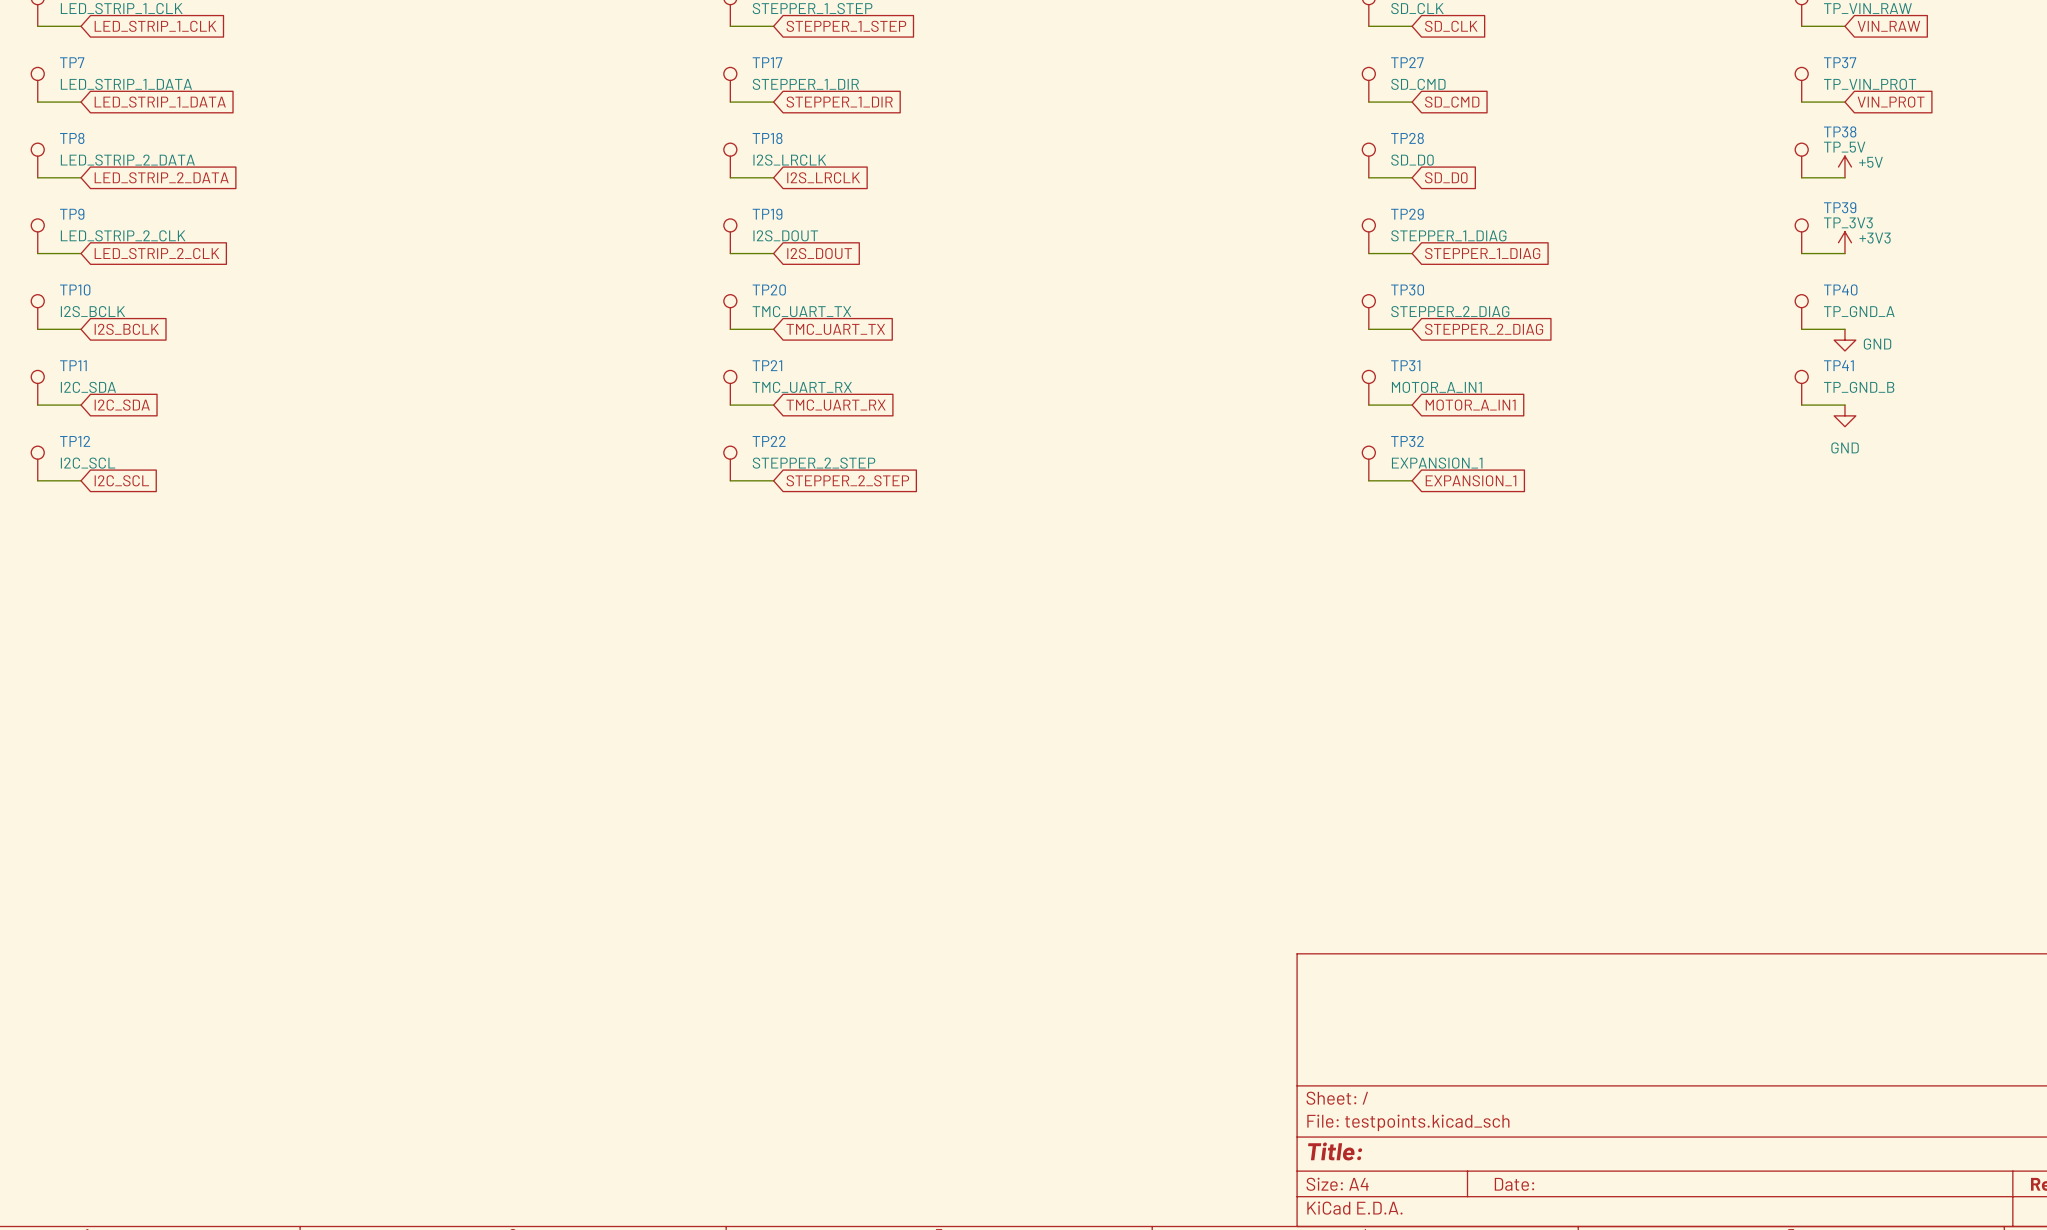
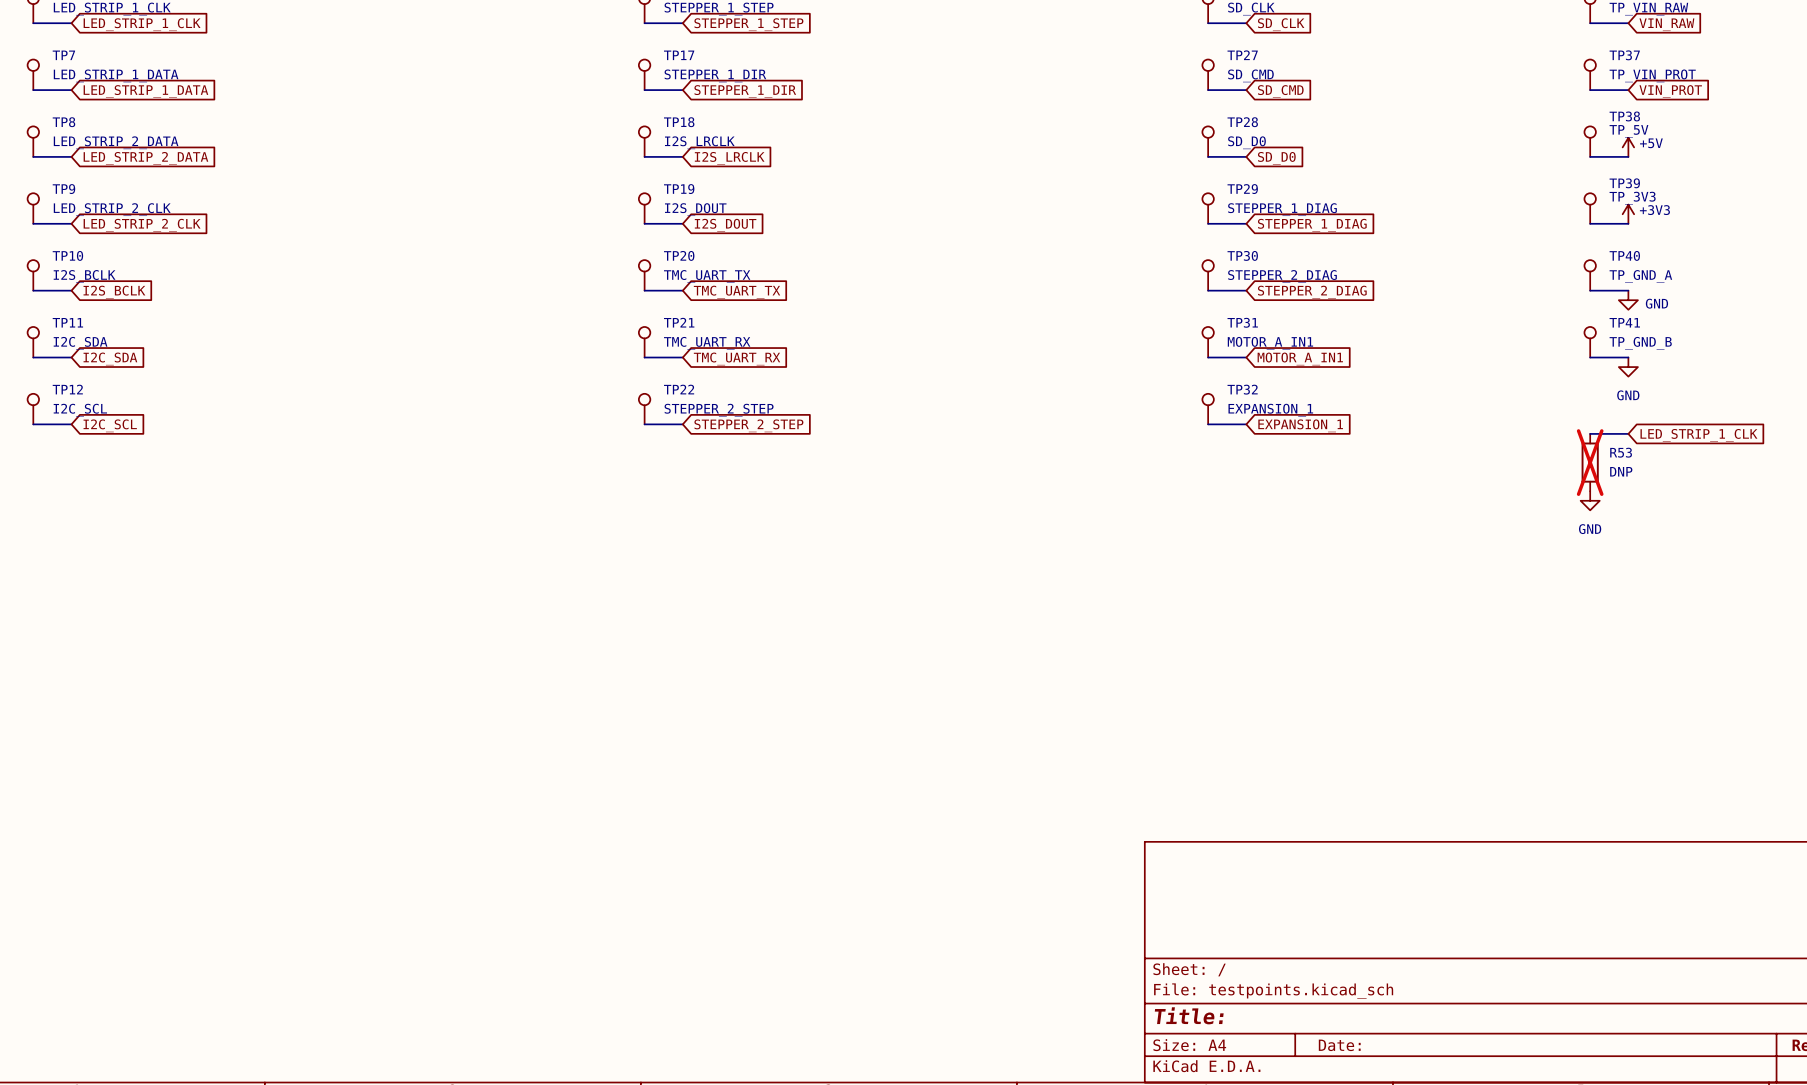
wire: none -> (1590, 433) (1628, 433)
global label: none -> LED_STRIP_1_CLK (1698, 435)
R53: none -> DNP (1590, 462)
power symbol: none -> GND (1590, 500)

